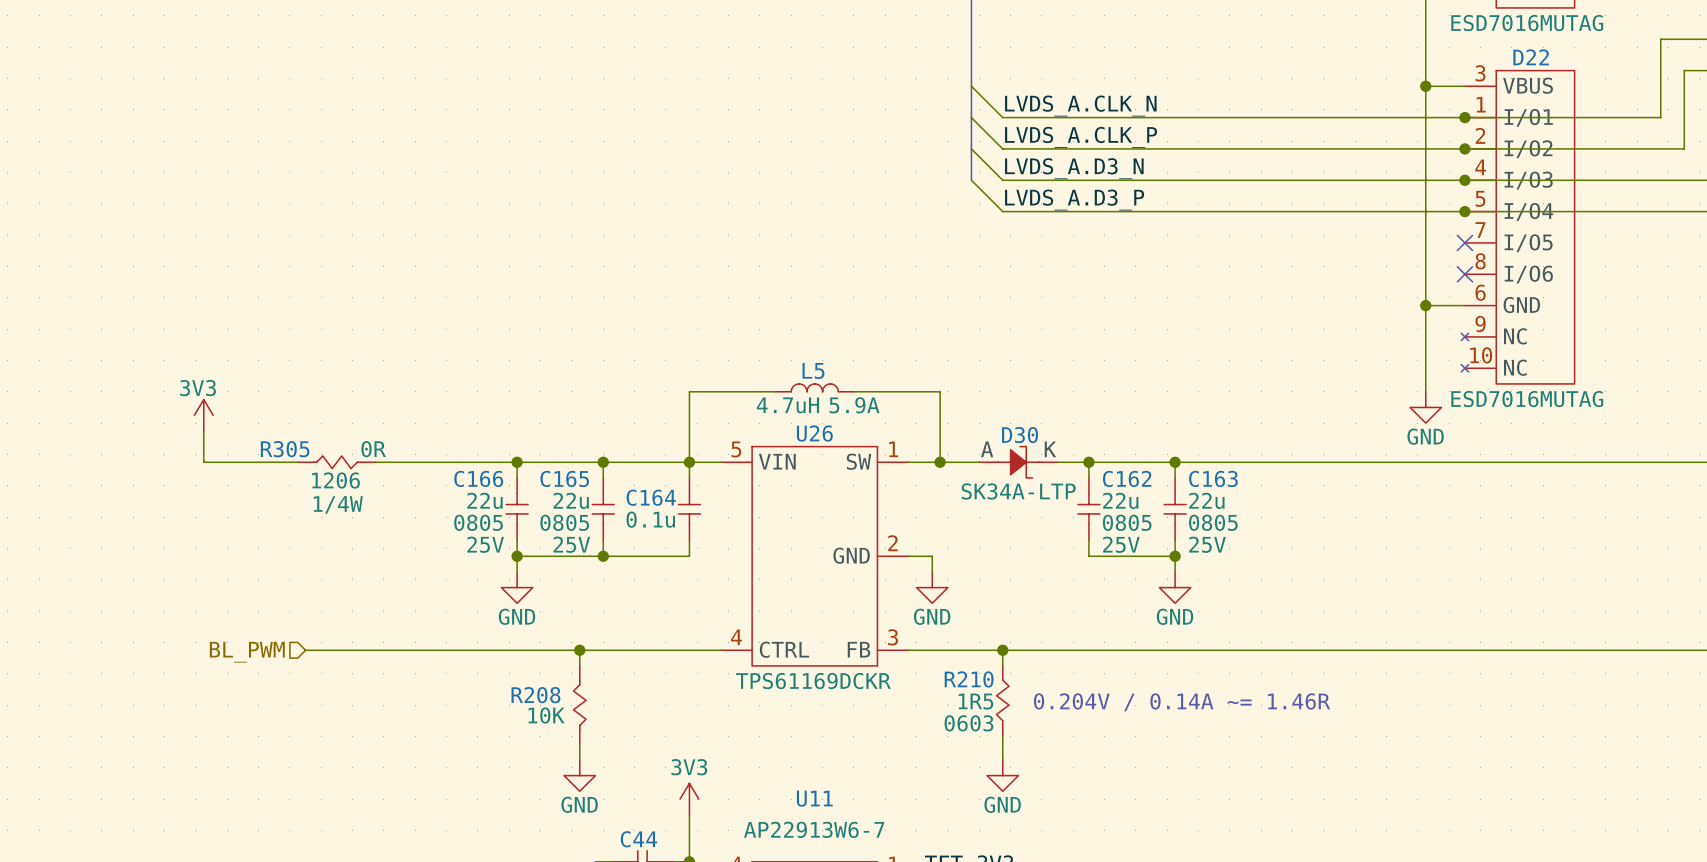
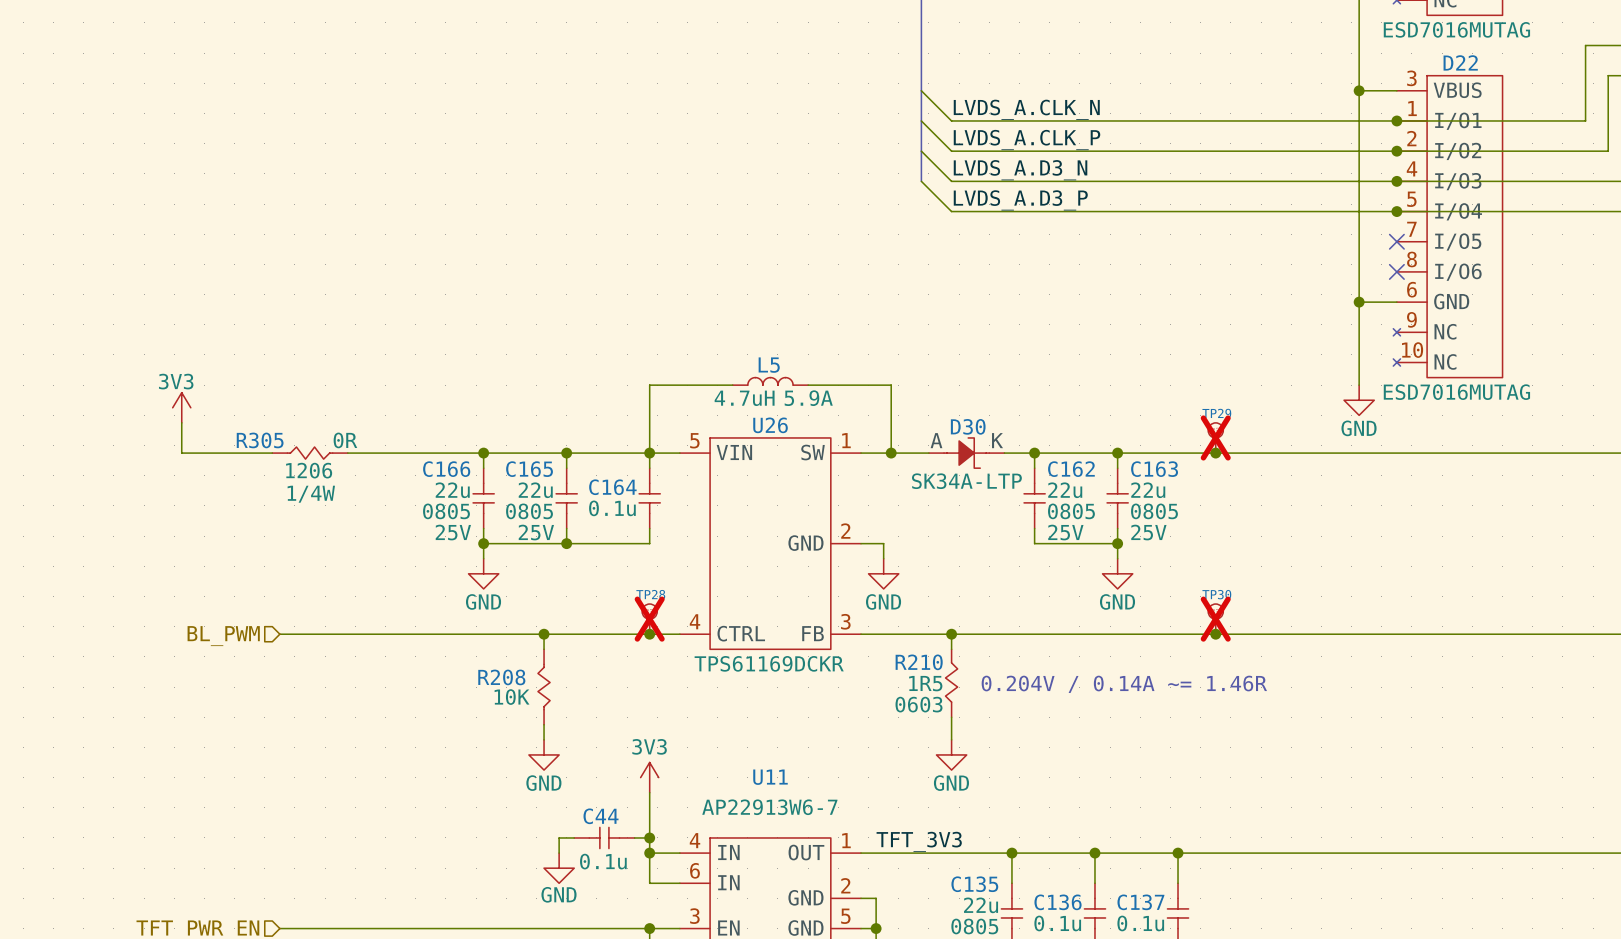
TP29: none -> (1215, 437)
junction: none -> (1215, 453)
TP28: none -> (649, 619)
TP30: none -> (1215, 619)
junction: none -> (649, 634)
junction: none -> (1215, 634)

